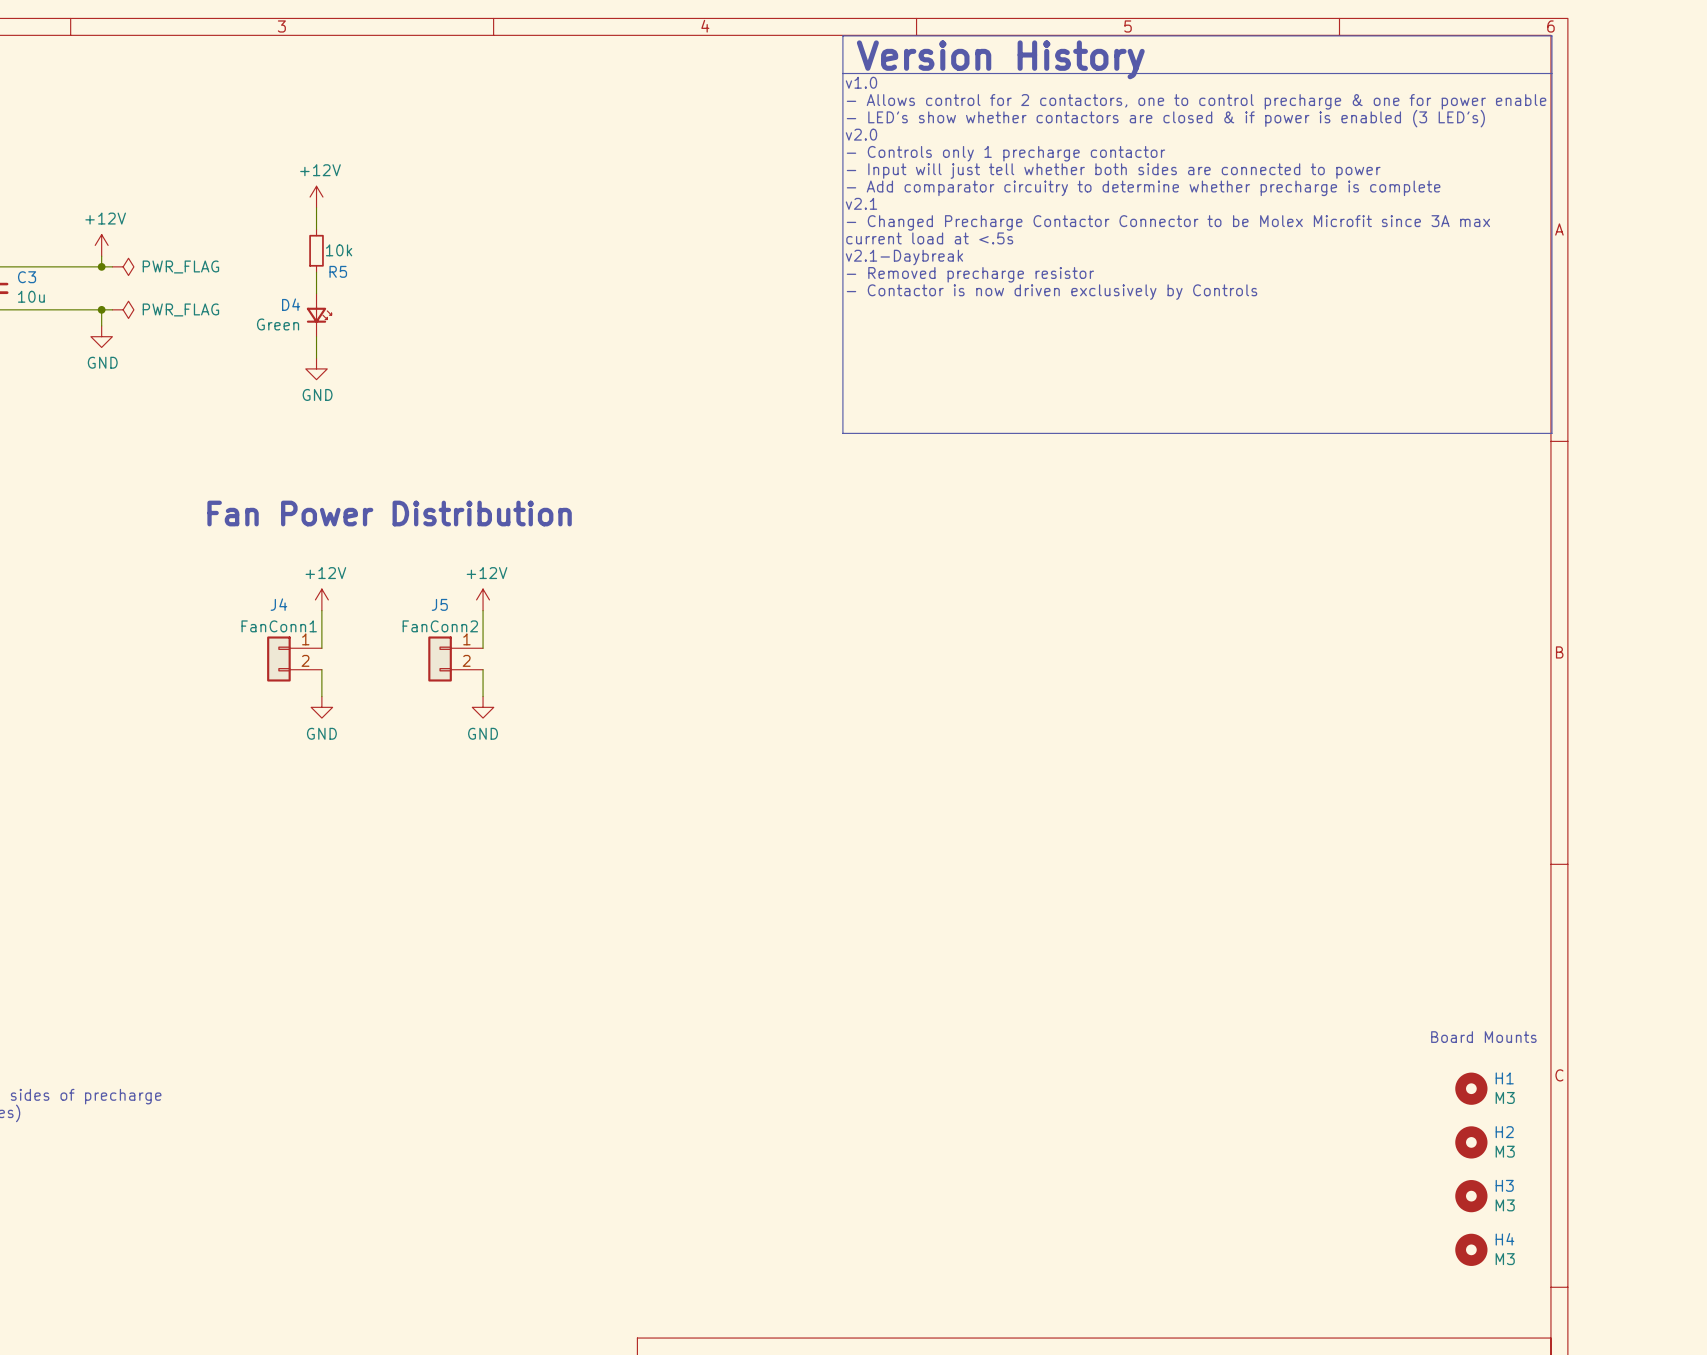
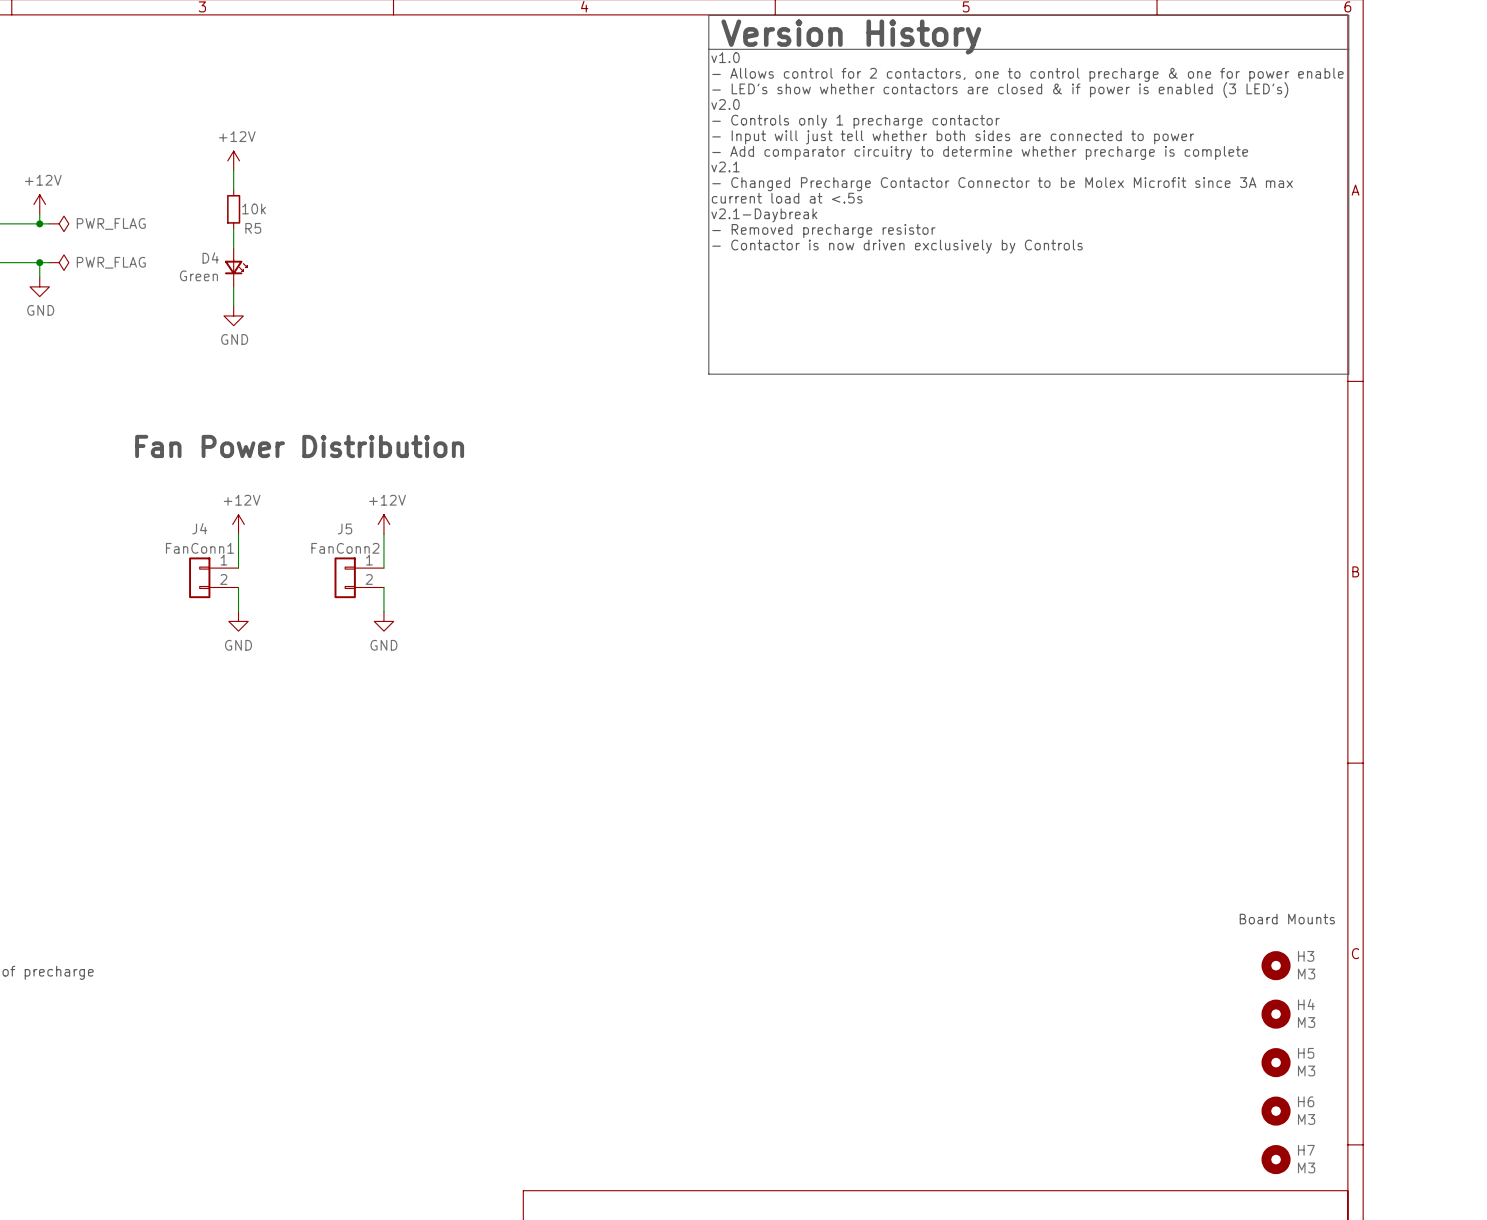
H1 name: H1 (1504, 1078) -> H3 (1306, 956)
H2 name: H2 (1504, 1132) -> H4 (1306, 1004)
H3 name: H3 (1504, 1185) -> H5 (1306, 1053)
H4 name: H4 (1504, 1239) -> H6 (1306, 1101)
H7: none -> M3 (1276, 1159)

